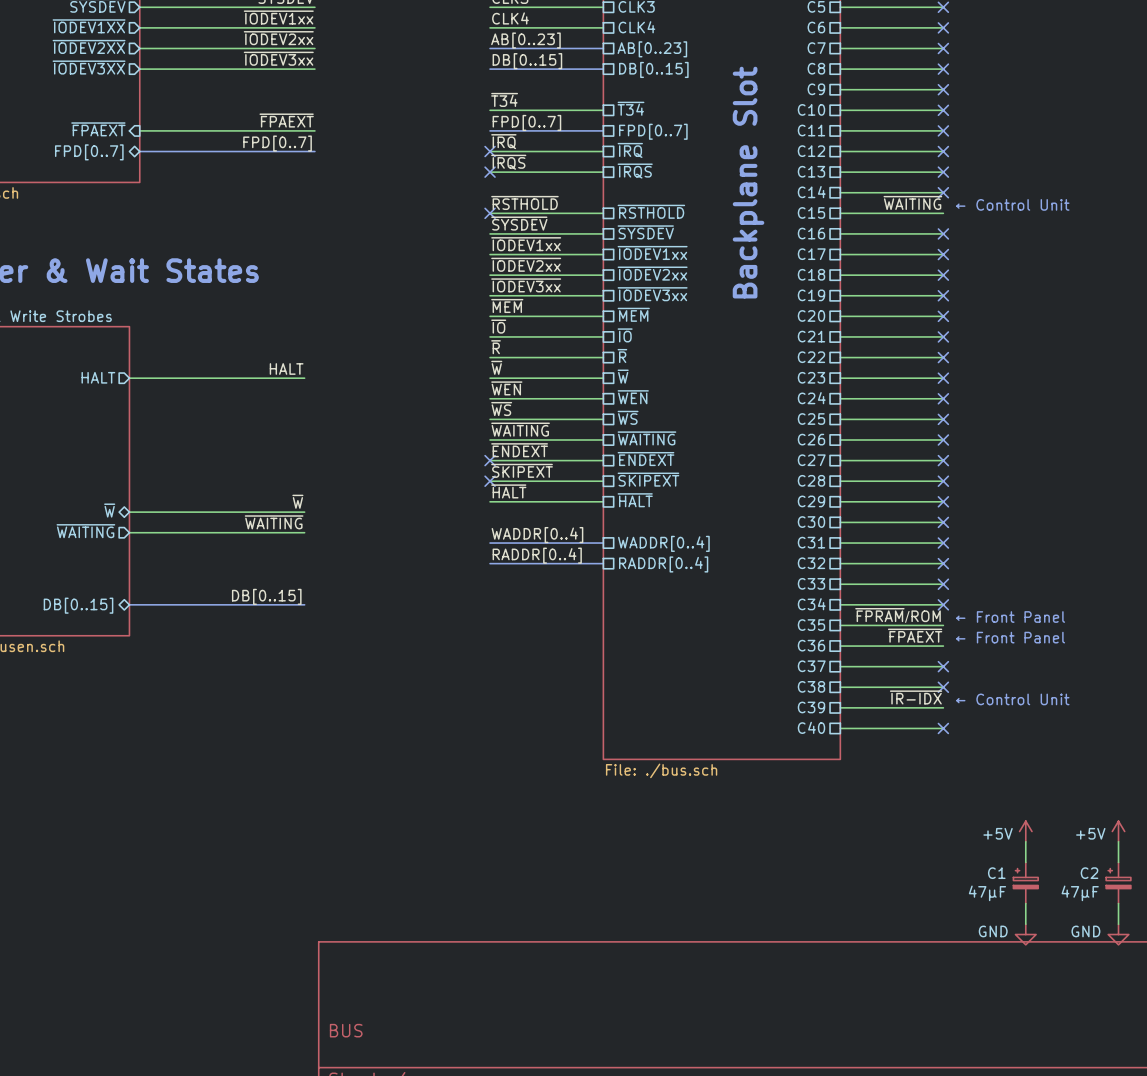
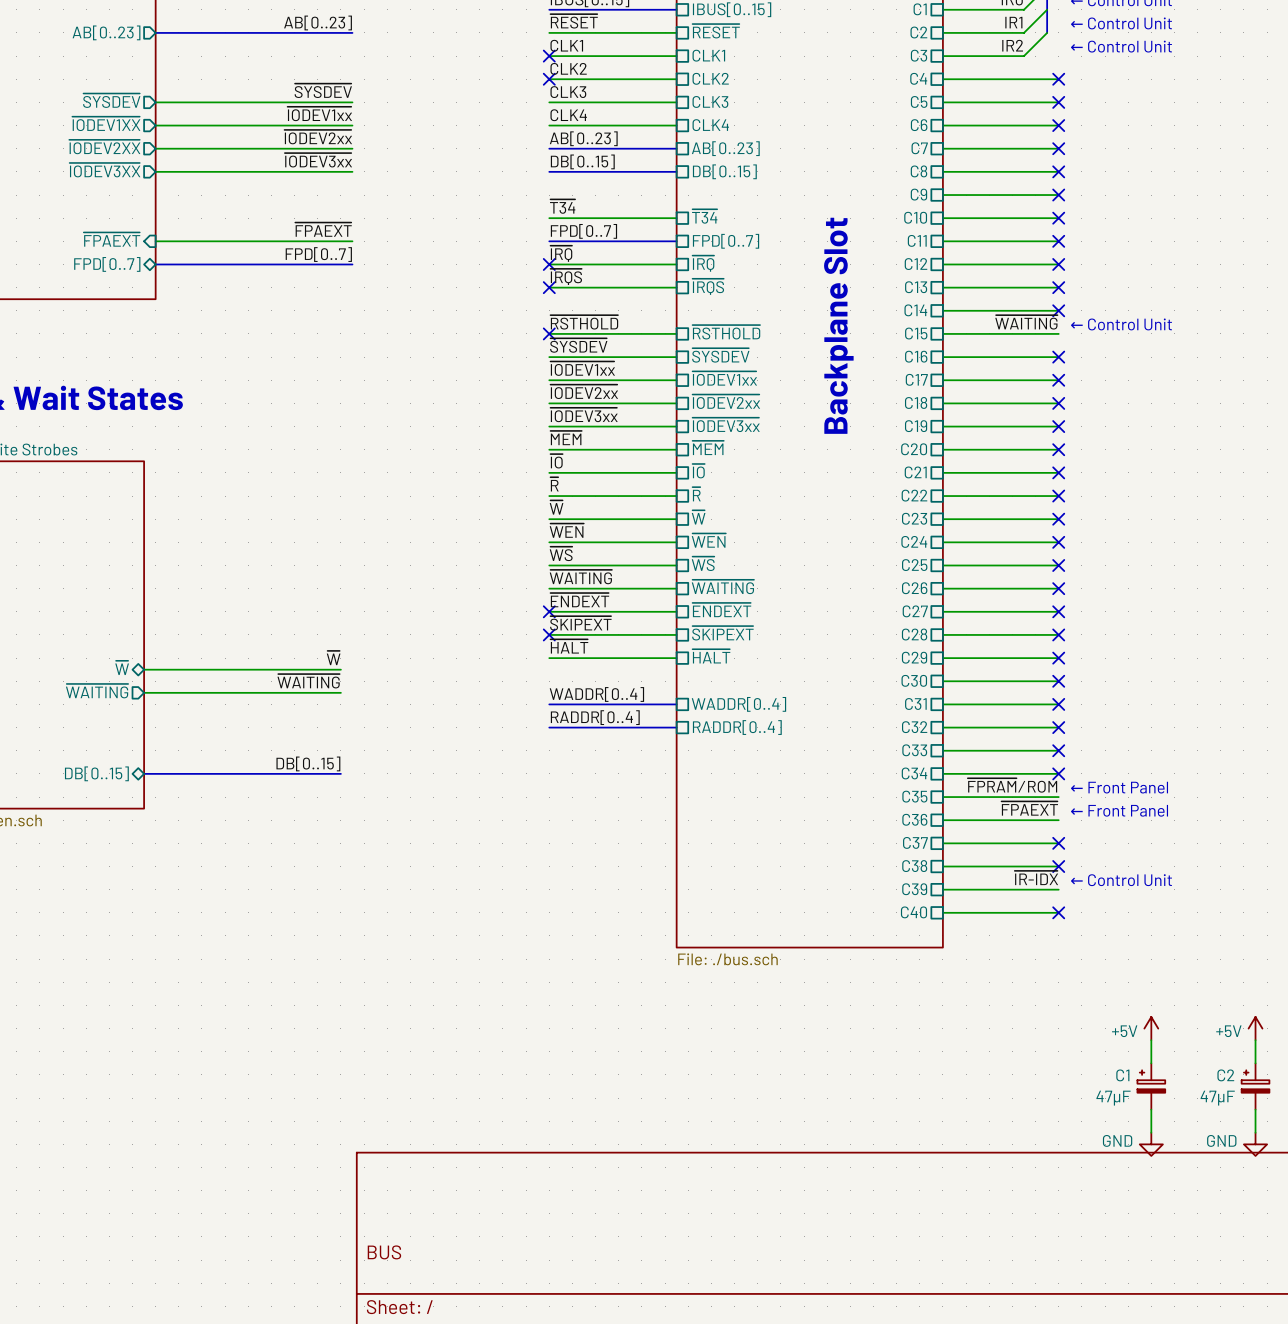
label: HALT (286, 368) -> none
sheet pin: HALT (98, 377) -> none
wire: (129, 378) (304, 378) -> none

